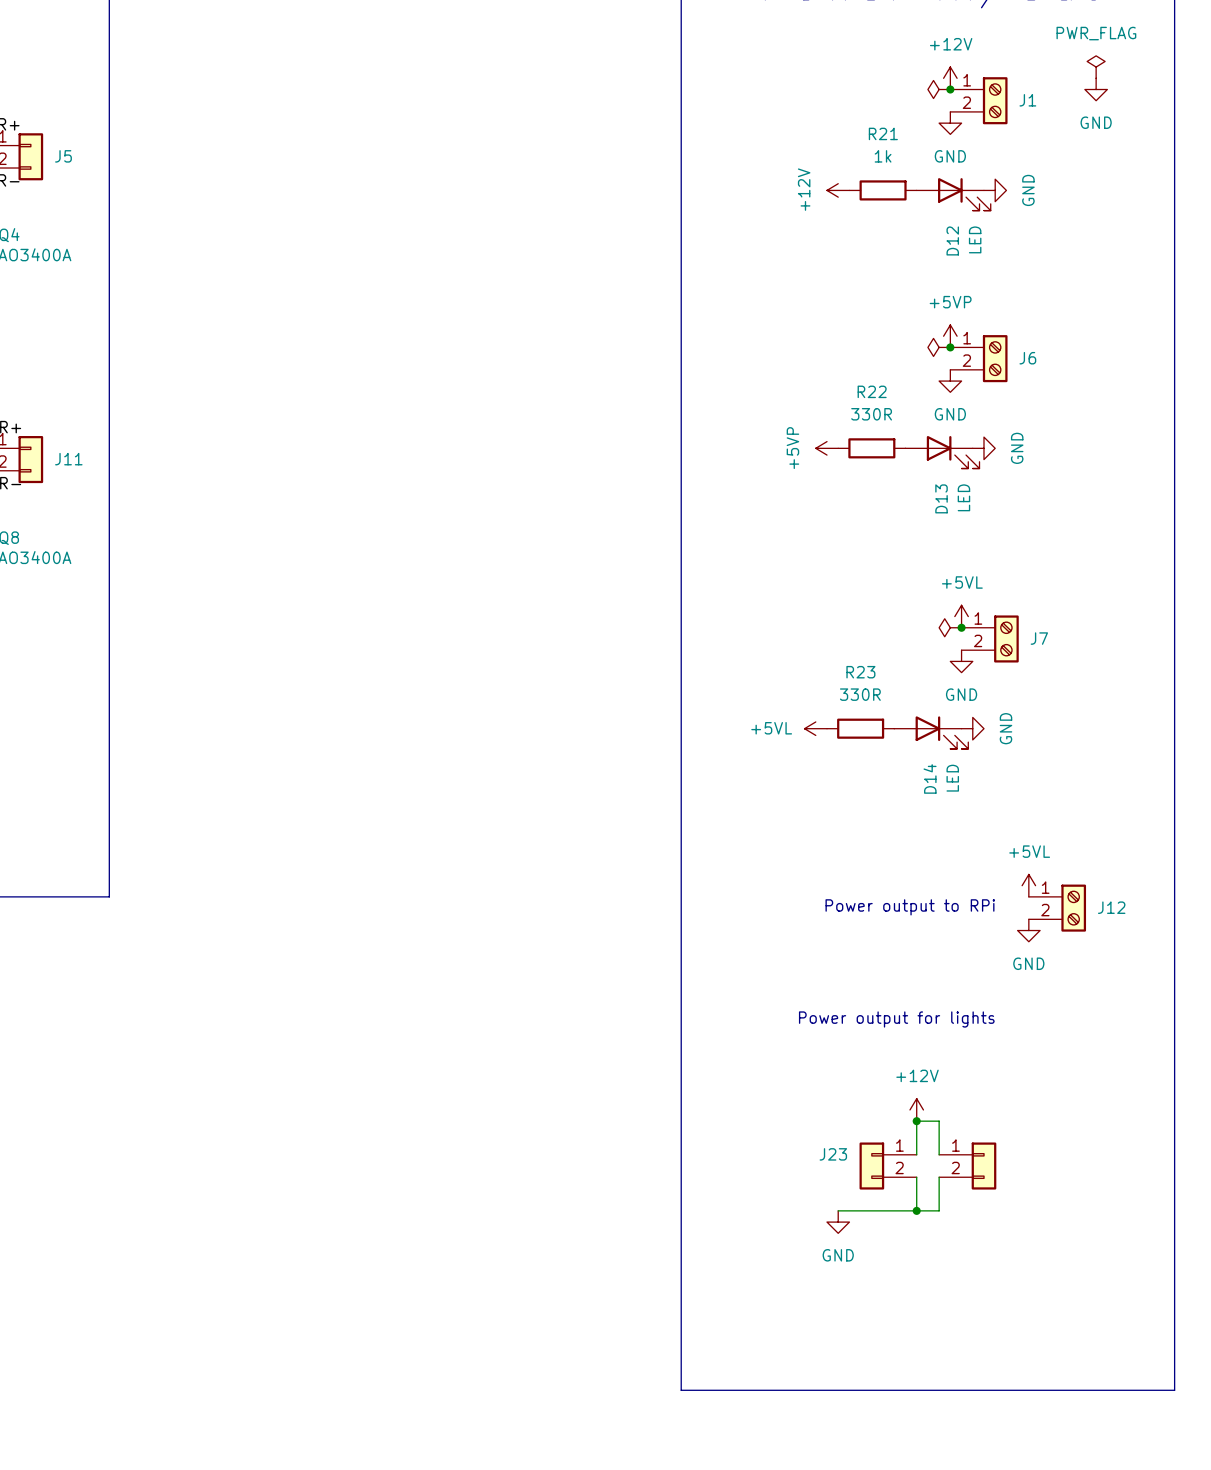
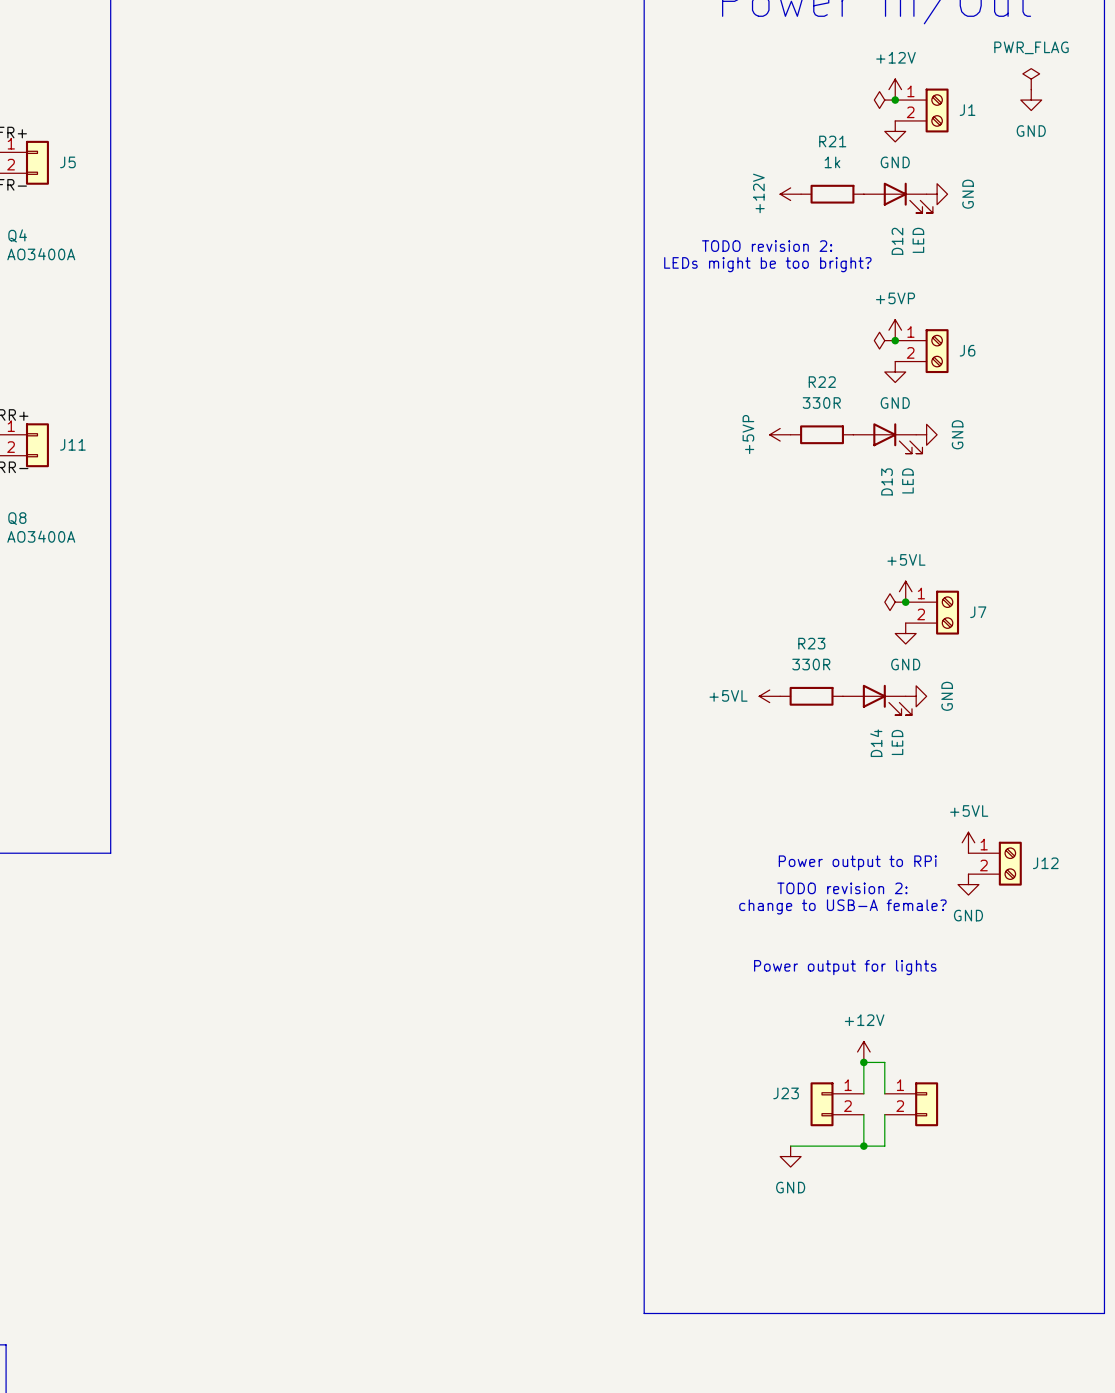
text: none -> TODO revision 2: (767, 246)
text: none -> LEDs might be too bright? (767, 264)
text: none -> TODO revision 2: (842, 888)
text: none -> change to USB-A female? (842, 906)

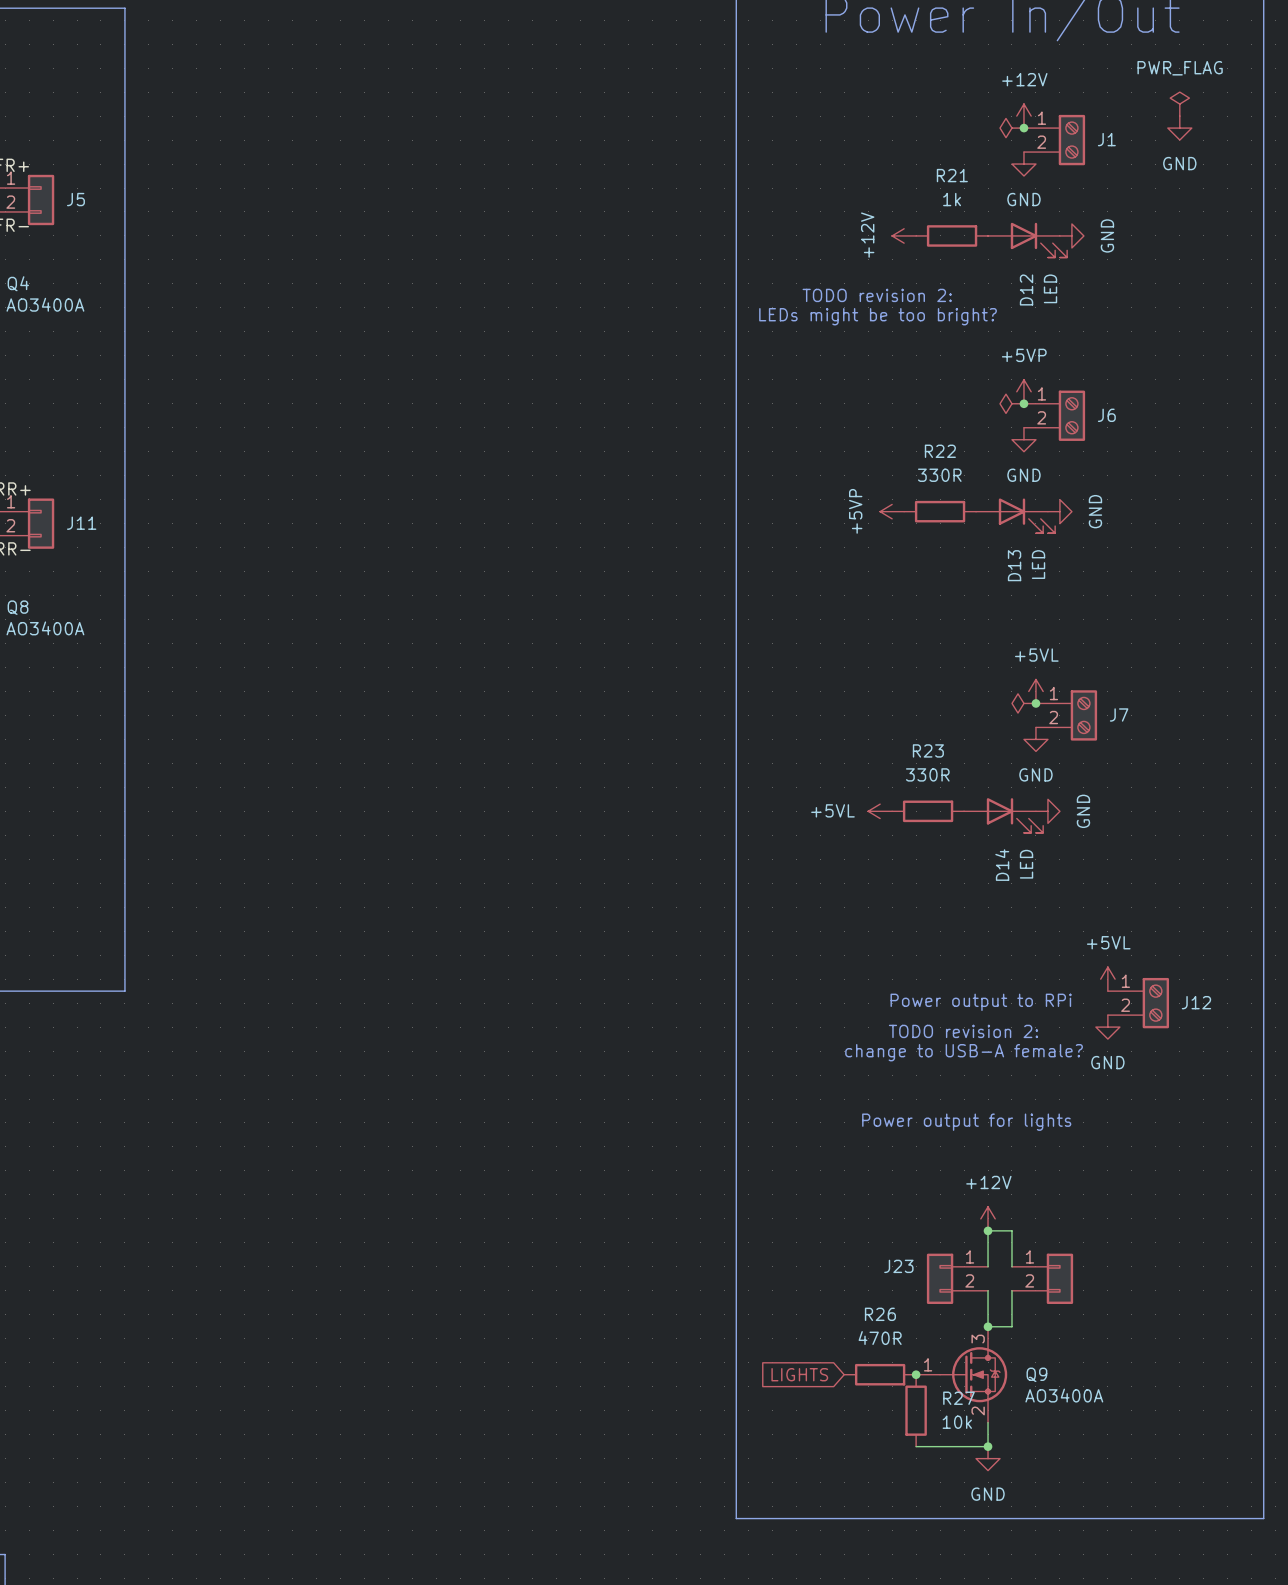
wire: (790, 1146) (863, 1146) -> none
power symbol position: GND (790, 1156) -> GND (988, 1458)
global label: none -> LIGHTS (799, 1374)
R26: none -> 470R (880, 1374)
junction: none -> (916, 1374)
Q9: none -> AO3400A (961, 1374)
R27: none -> 10k (916, 1410)
wire: none -> (988, 1422) (988, 1446) (916, 1446)
junction: none -> (988, 1446)

